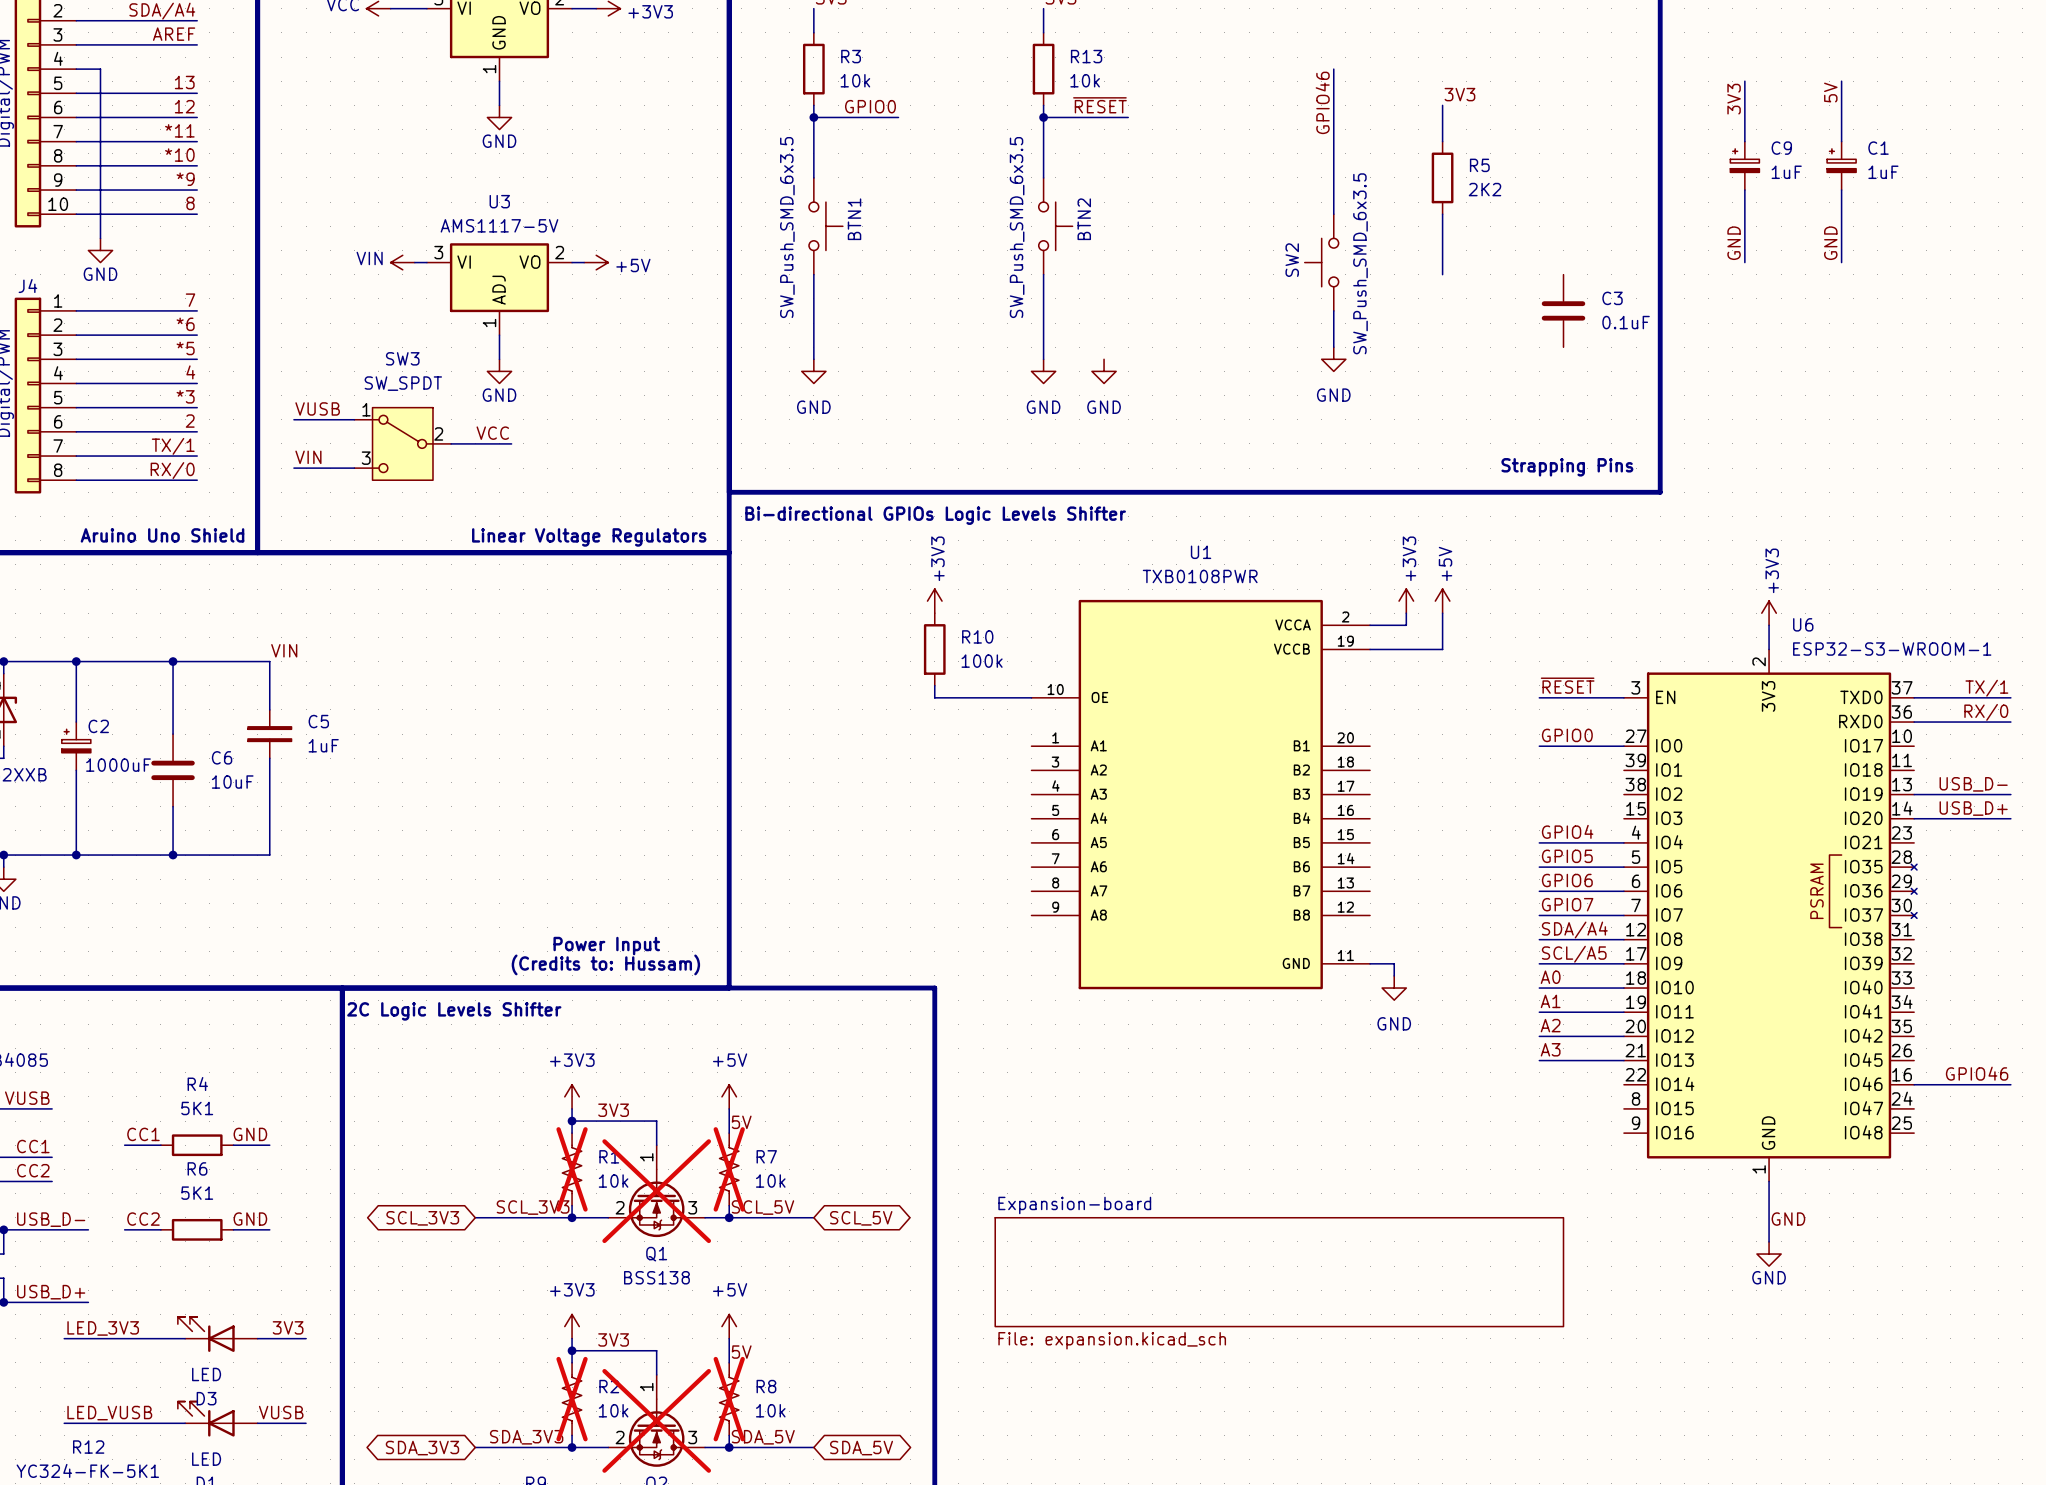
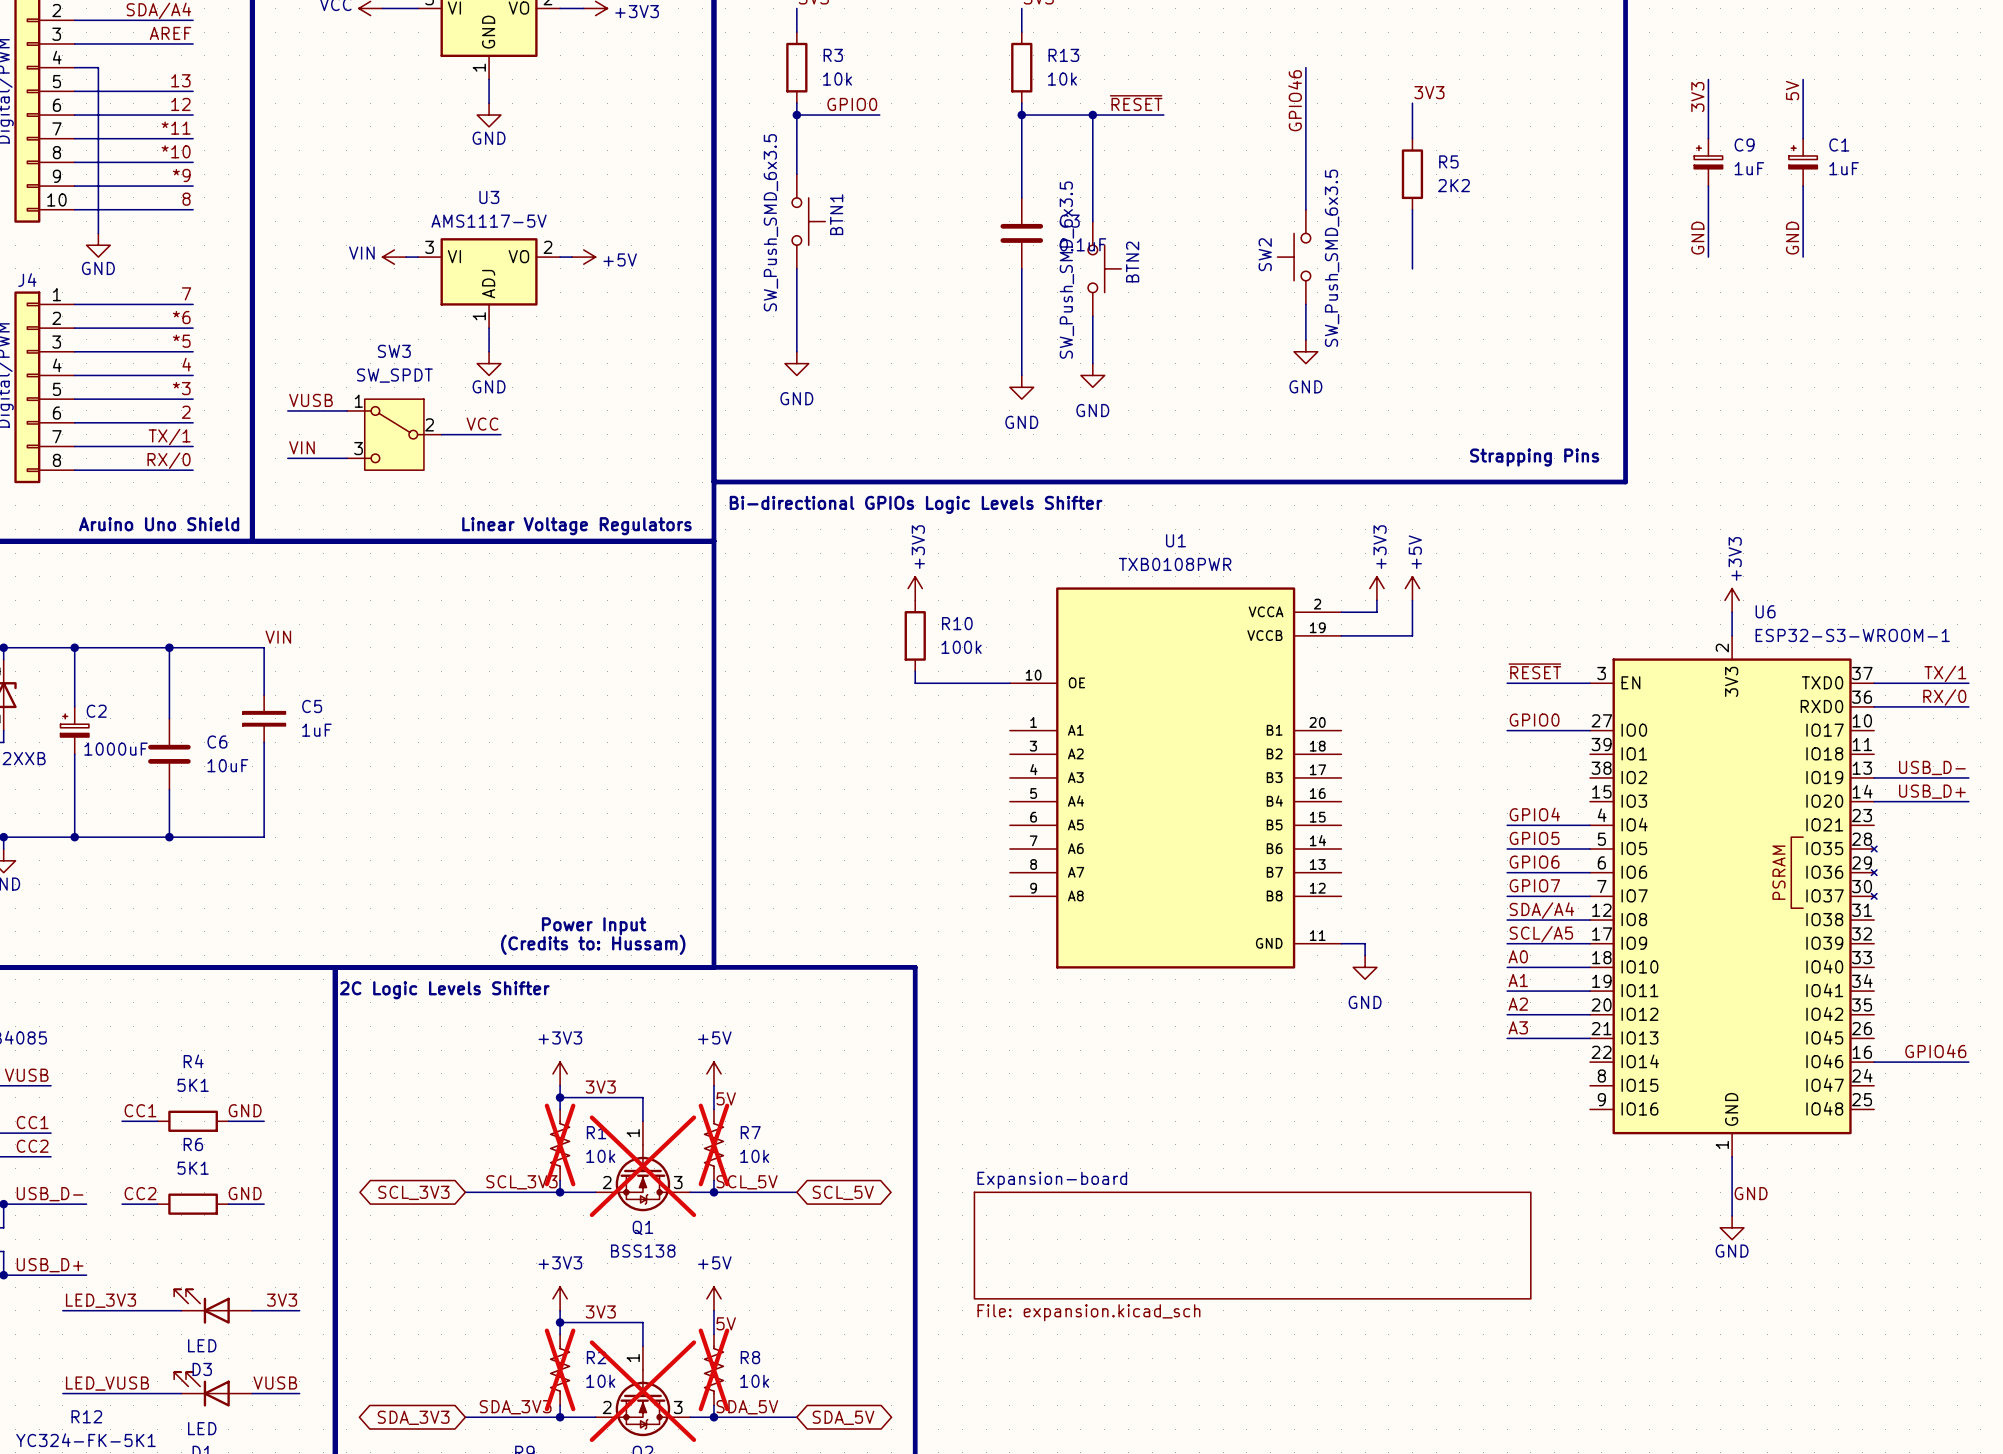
label position: ~{RESET} (1099, 105) -> ~{RESET} (1136, 103)
wire: none -> (1092, 115) (1092, 221)
junction: none -> (1092, 115)
wire: none -> (1104, 115) (1163, 115)
BTN2 position: (1055, 226) -> (1104, 268)
C3 position: (1563, 310) -> (1021, 233)
wire: none -> (1092, 316) (1092, 363)
power symbol position: GND (1043, 371) -> GND (1021, 387)
power symbol position: GND (1104, 371) -> GND (1092, 375)

